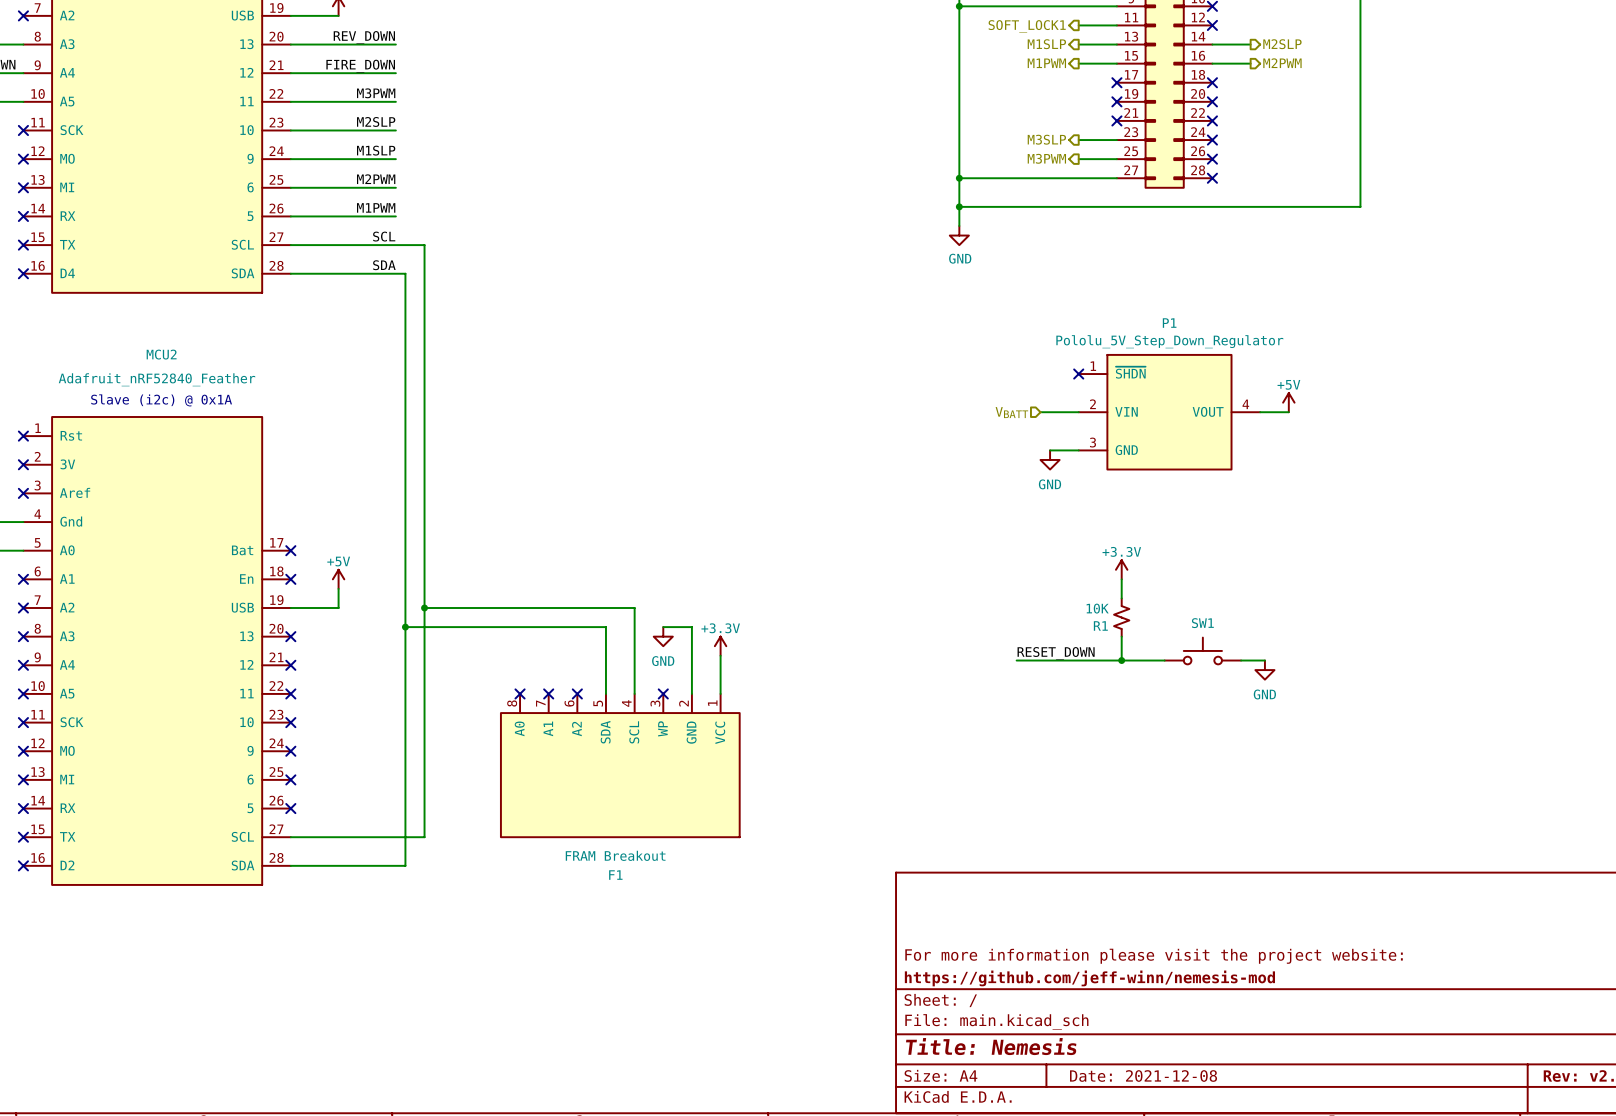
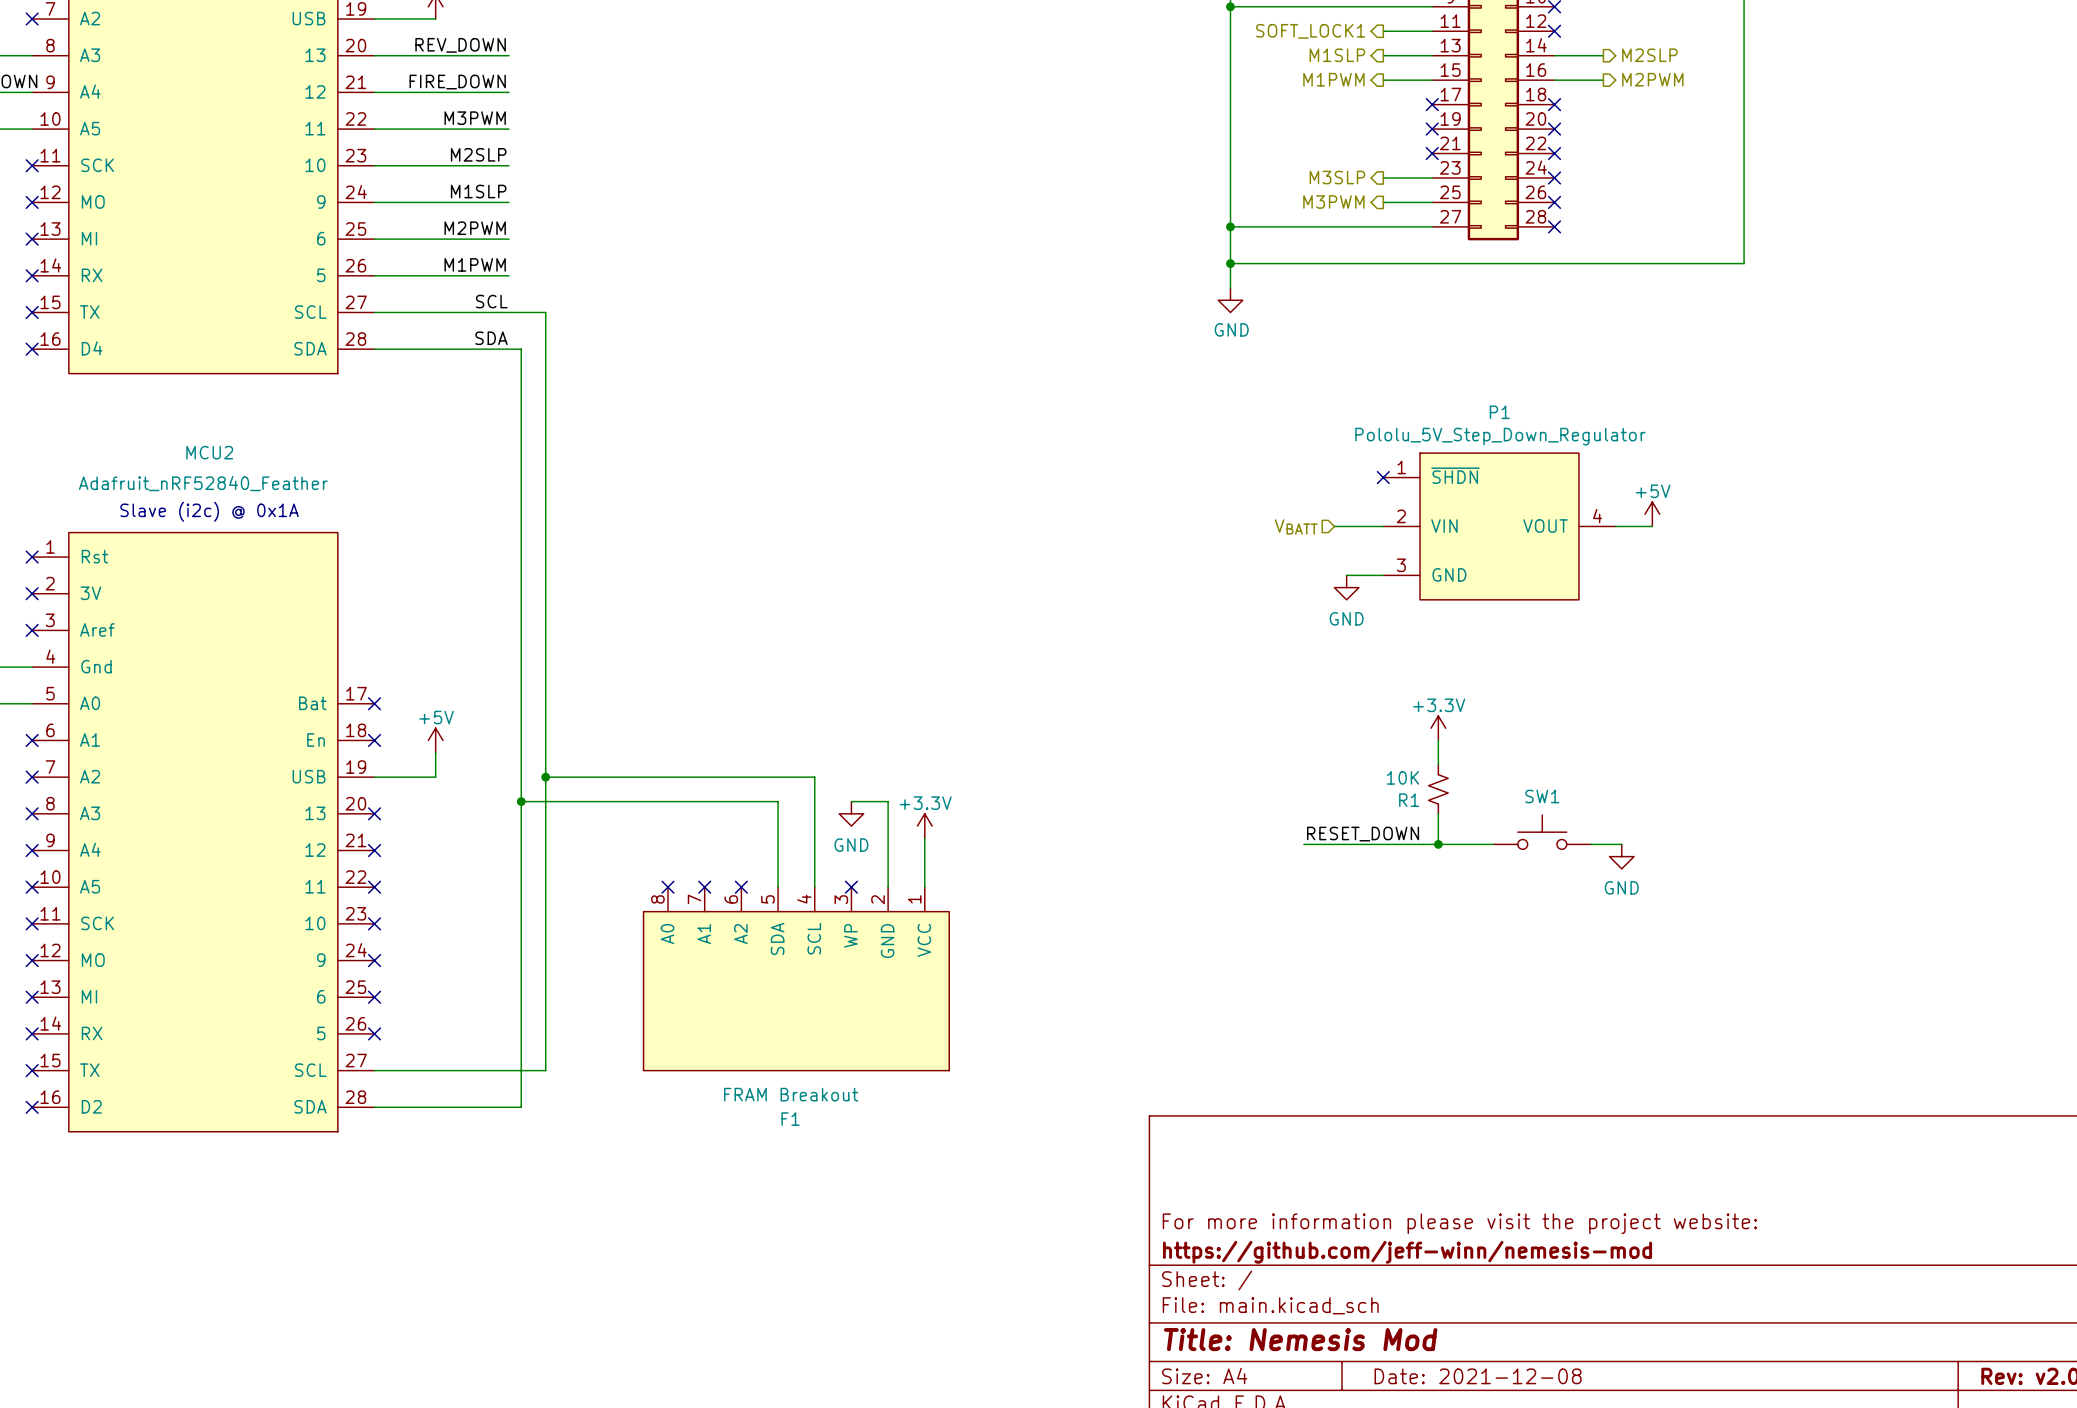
title block: Title: Nemesis (991, 1046) -> Title: Nemesis Mod (1300, 1339)

